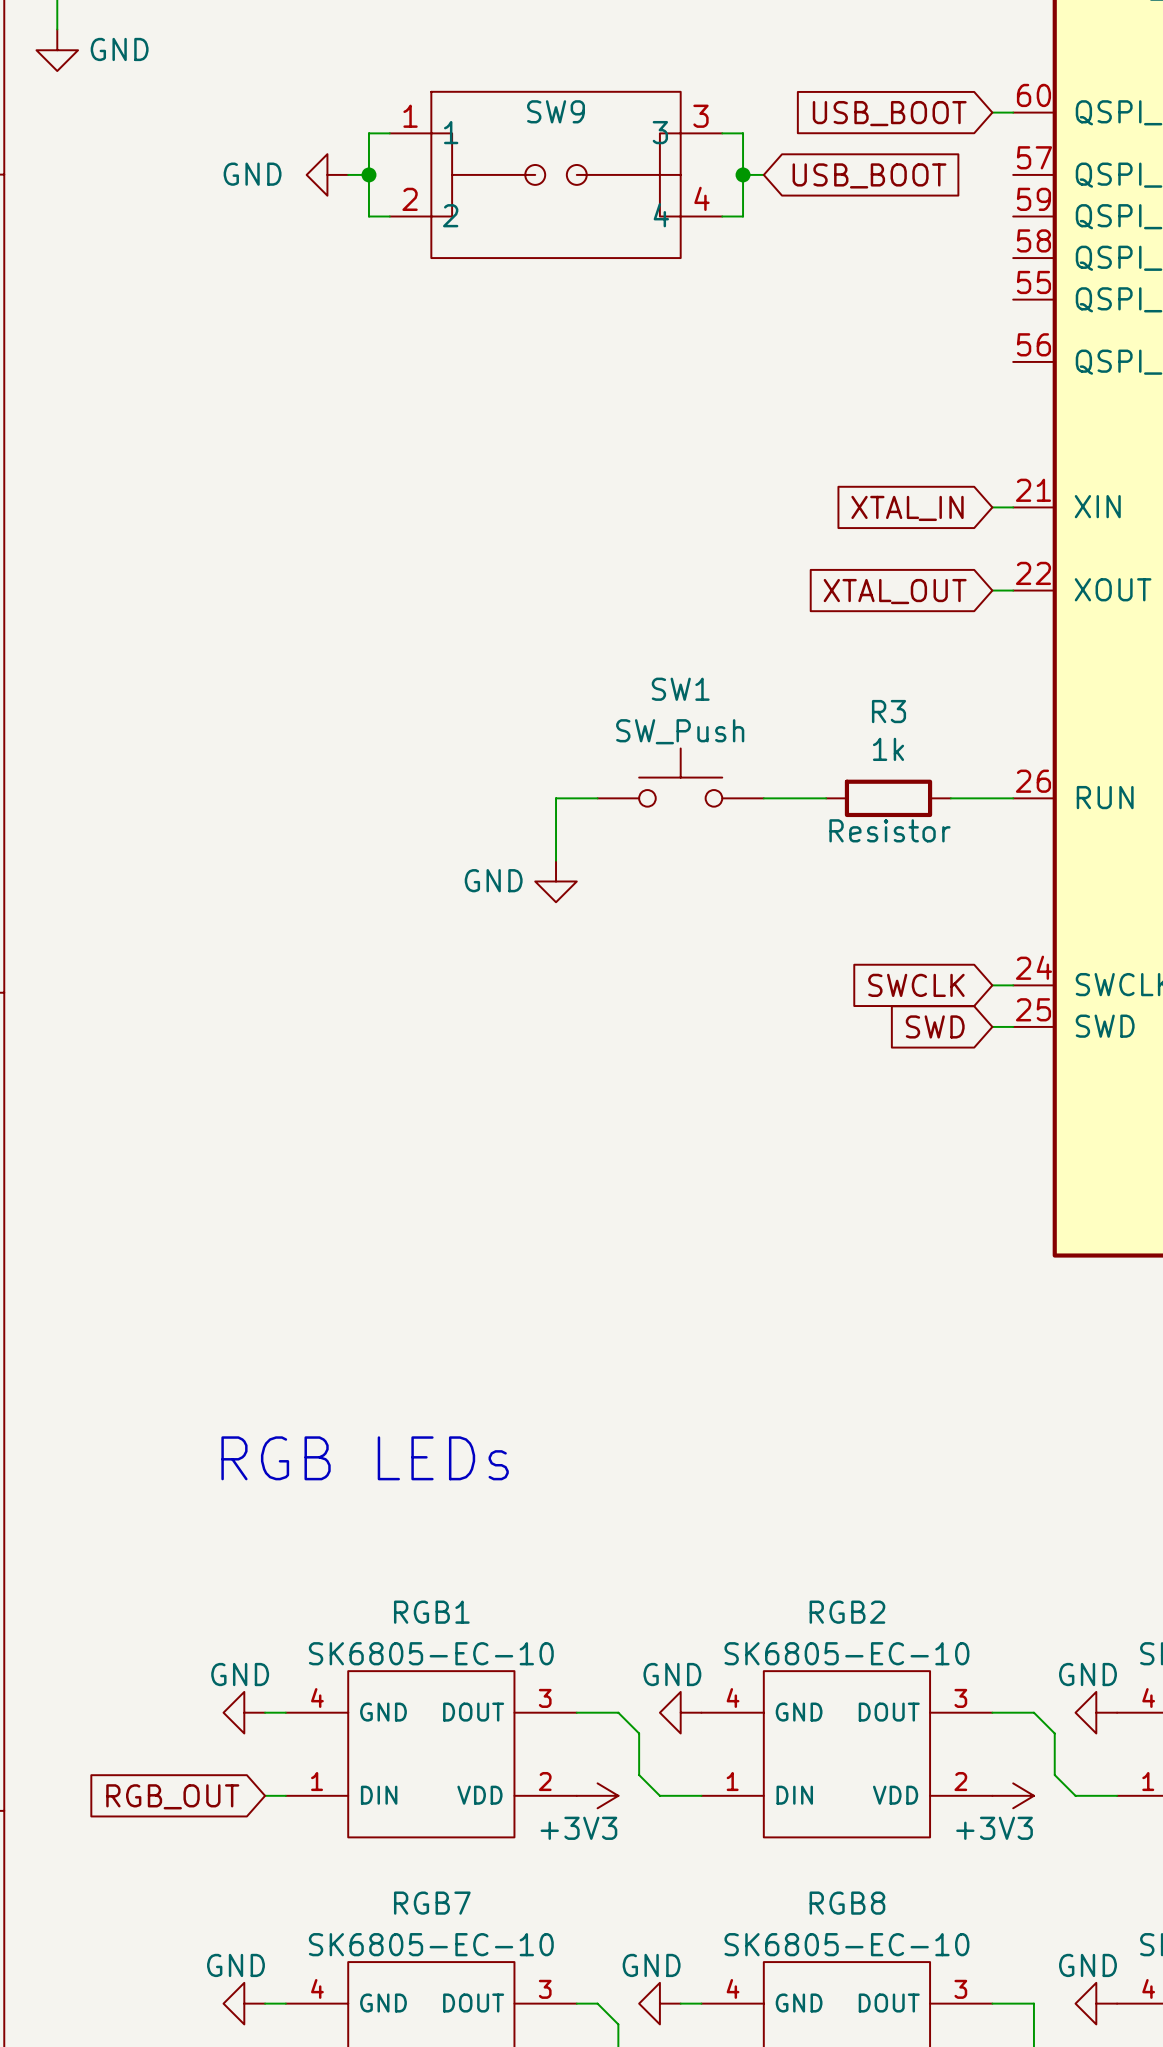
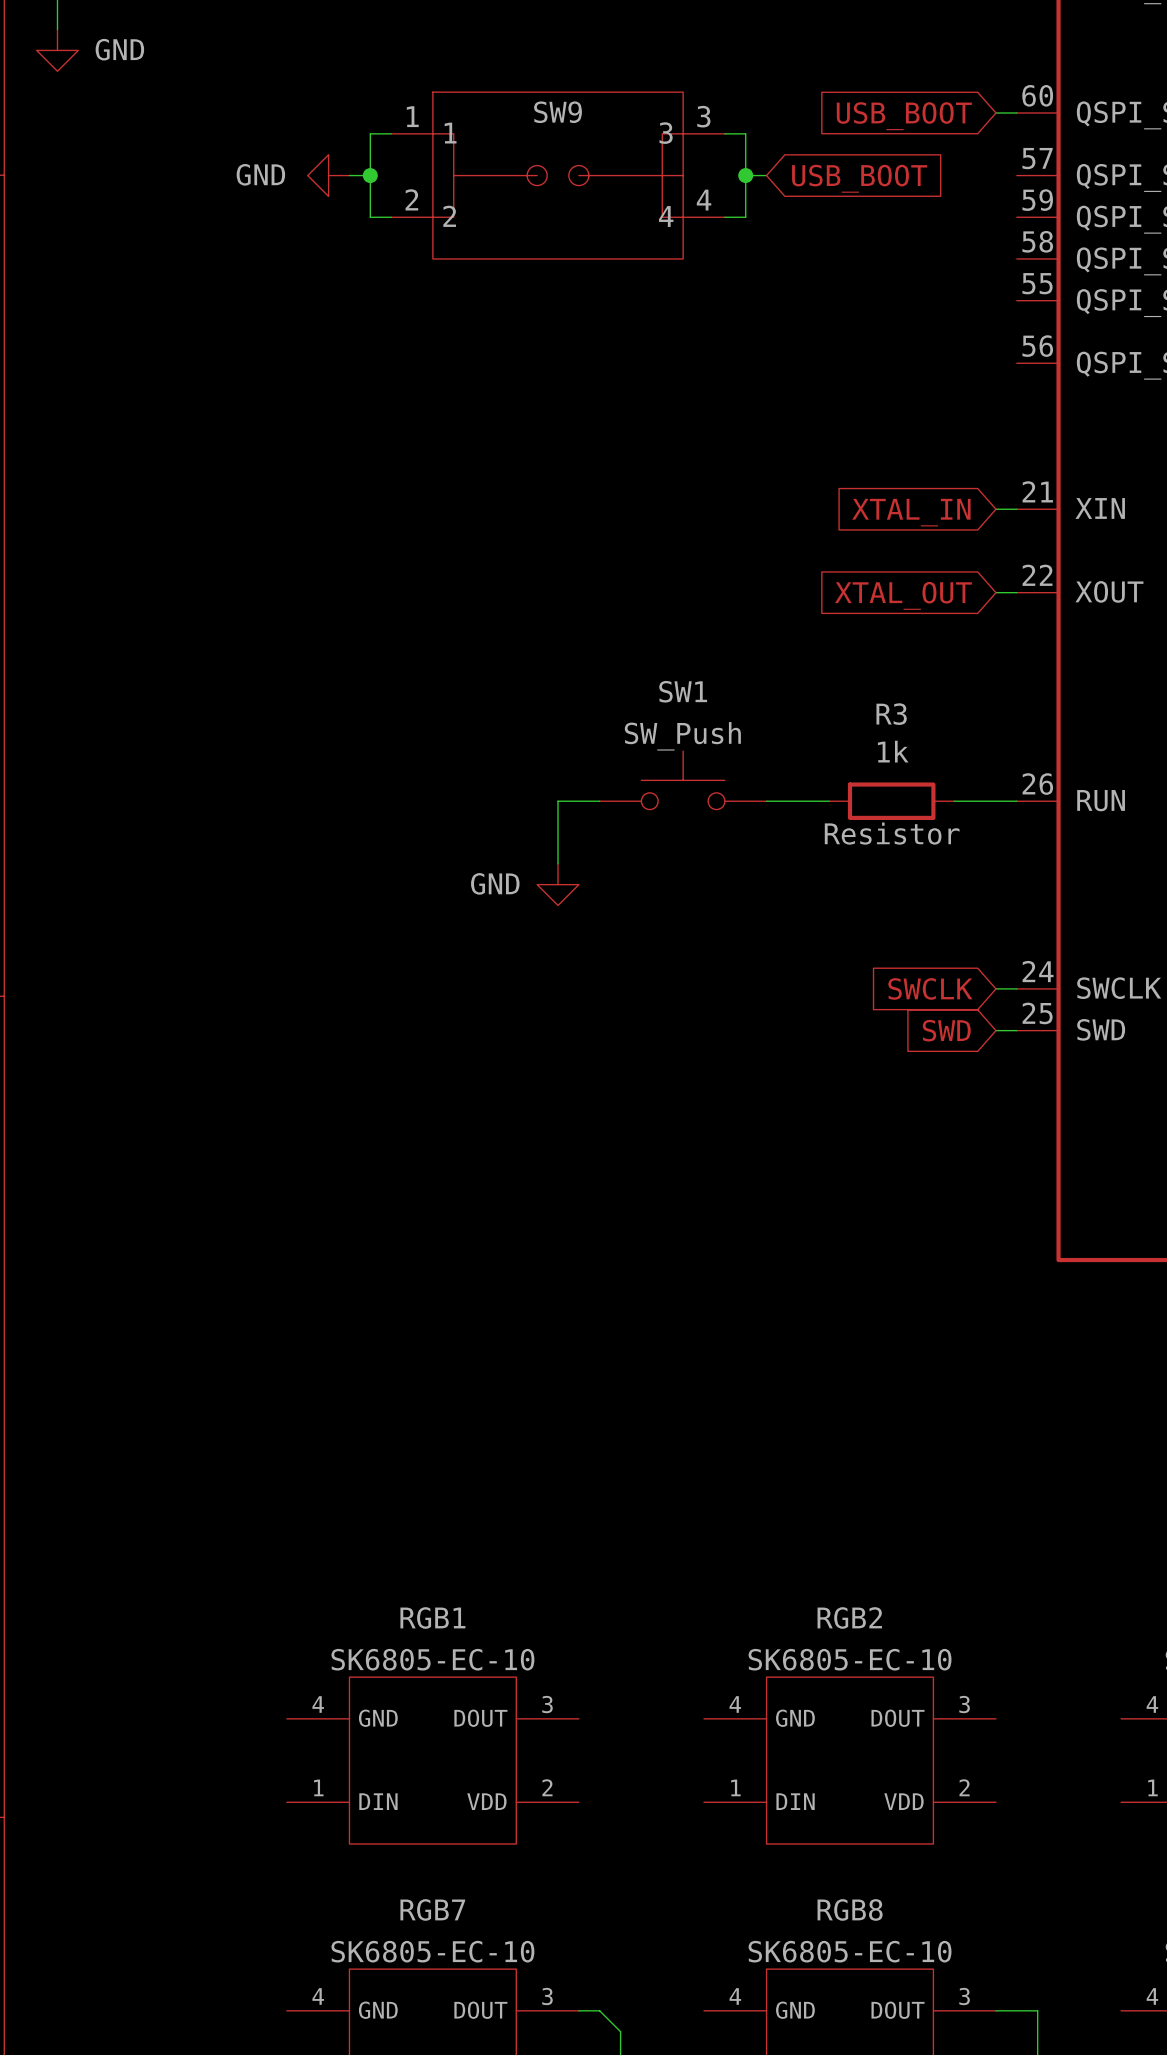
text: RGB LEDs (365, 1458) -> none
power symbol: GND (244, 1712) -> none
wire: (265, 1712) (285, 1712) -> none
wire: (576, 1712) (618, 1712) (639, 1733) (639, 1775) (659, 1795) (701, 1795) -> none
power symbol: GND (680, 1712) -> none
wire: (992, 1712) (1033, 1712) (1054, 1733) (1054, 1775) (1075, 1795) (1117, 1795) -> none
power symbol: GND (1096, 1712) -> none
wire: (265, 1795) (285, 1795) -> none
power symbol: +3V3 (597, 1795) -> none
power symbol: +3V3 (1013, 1795) -> none
global label: RGB_OUT (172, 1796) -> none
power symbol: GND (244, 2003) -> none
wire: (265, 2003) (285, 2003) -> none
power symbol: GND (659, 2003) -> none
wire: (680, 2003) (701, 2003) -> none
power symbol: GND (1096, 2003) -> none

